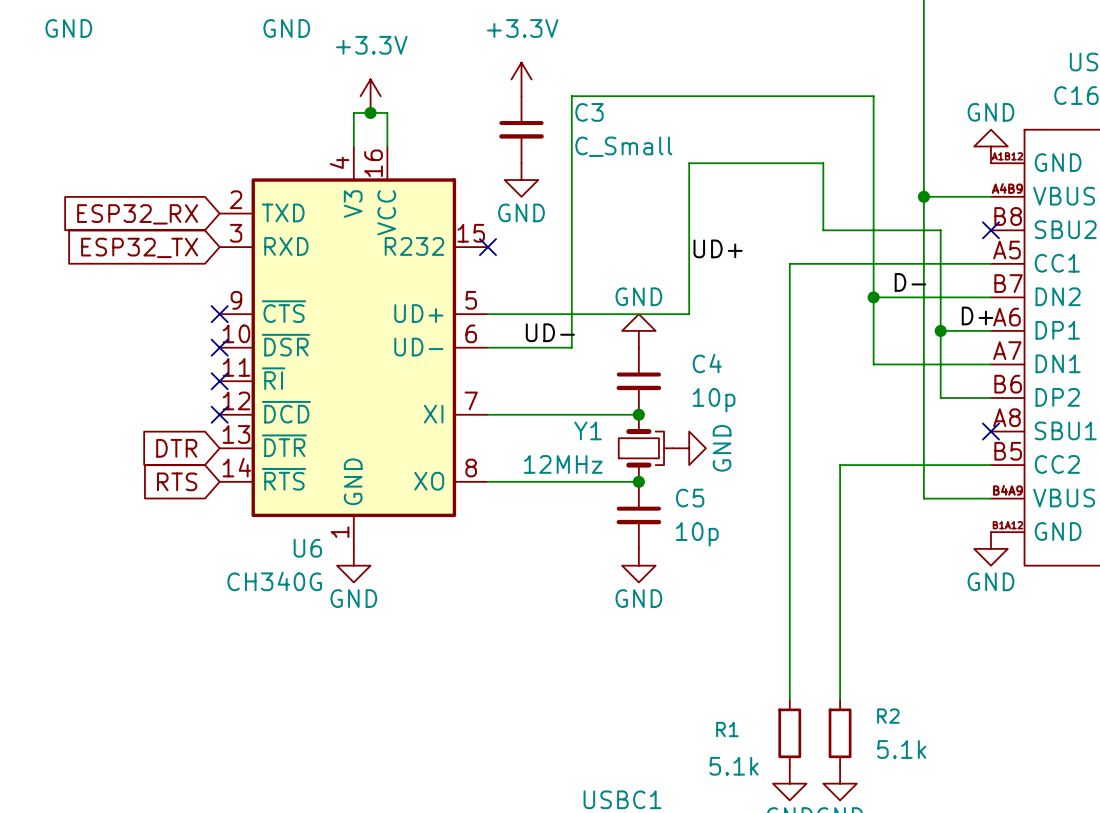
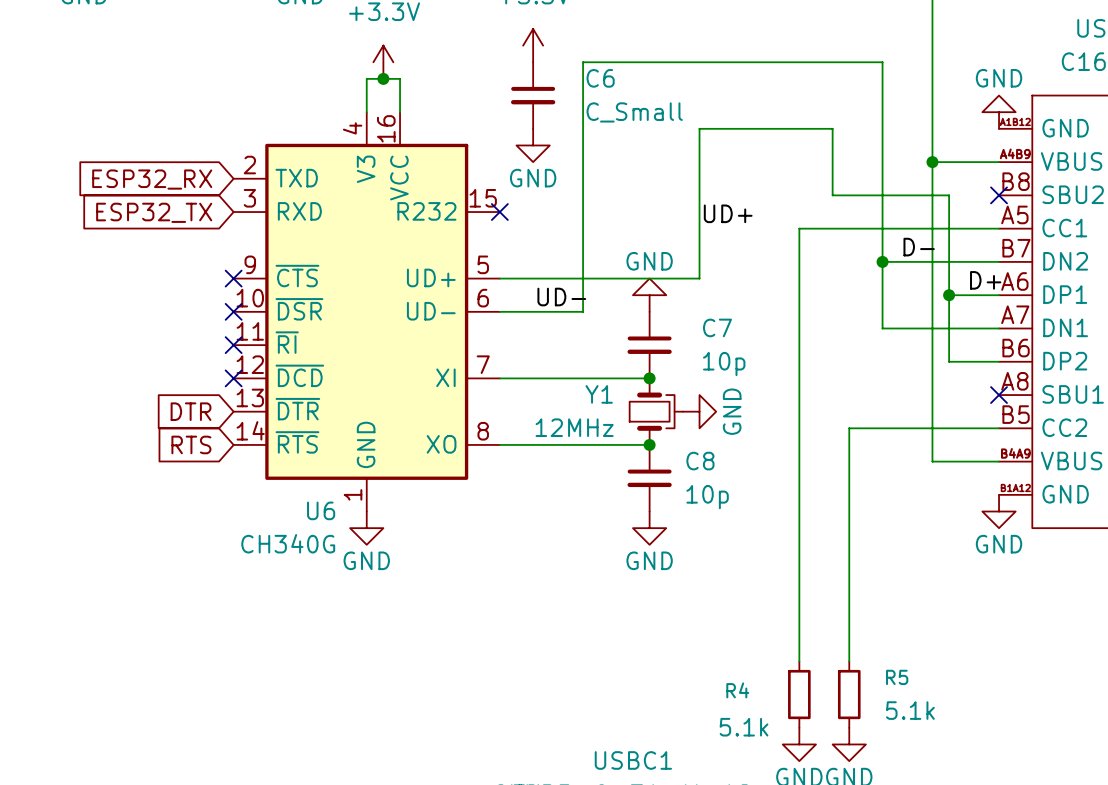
C3 name: C3 (589, 112) -> C6 (600, 78)
C4 name: C4 (707, 363) -> C7 (717, 327)
C5 name: C5 (690, 498) -> C8 (700, 461)
R2 name: R2 (888, 716) -> R5 (897, 677)
R1 name: R1 (727, 729) -> R4 (737, 690)

